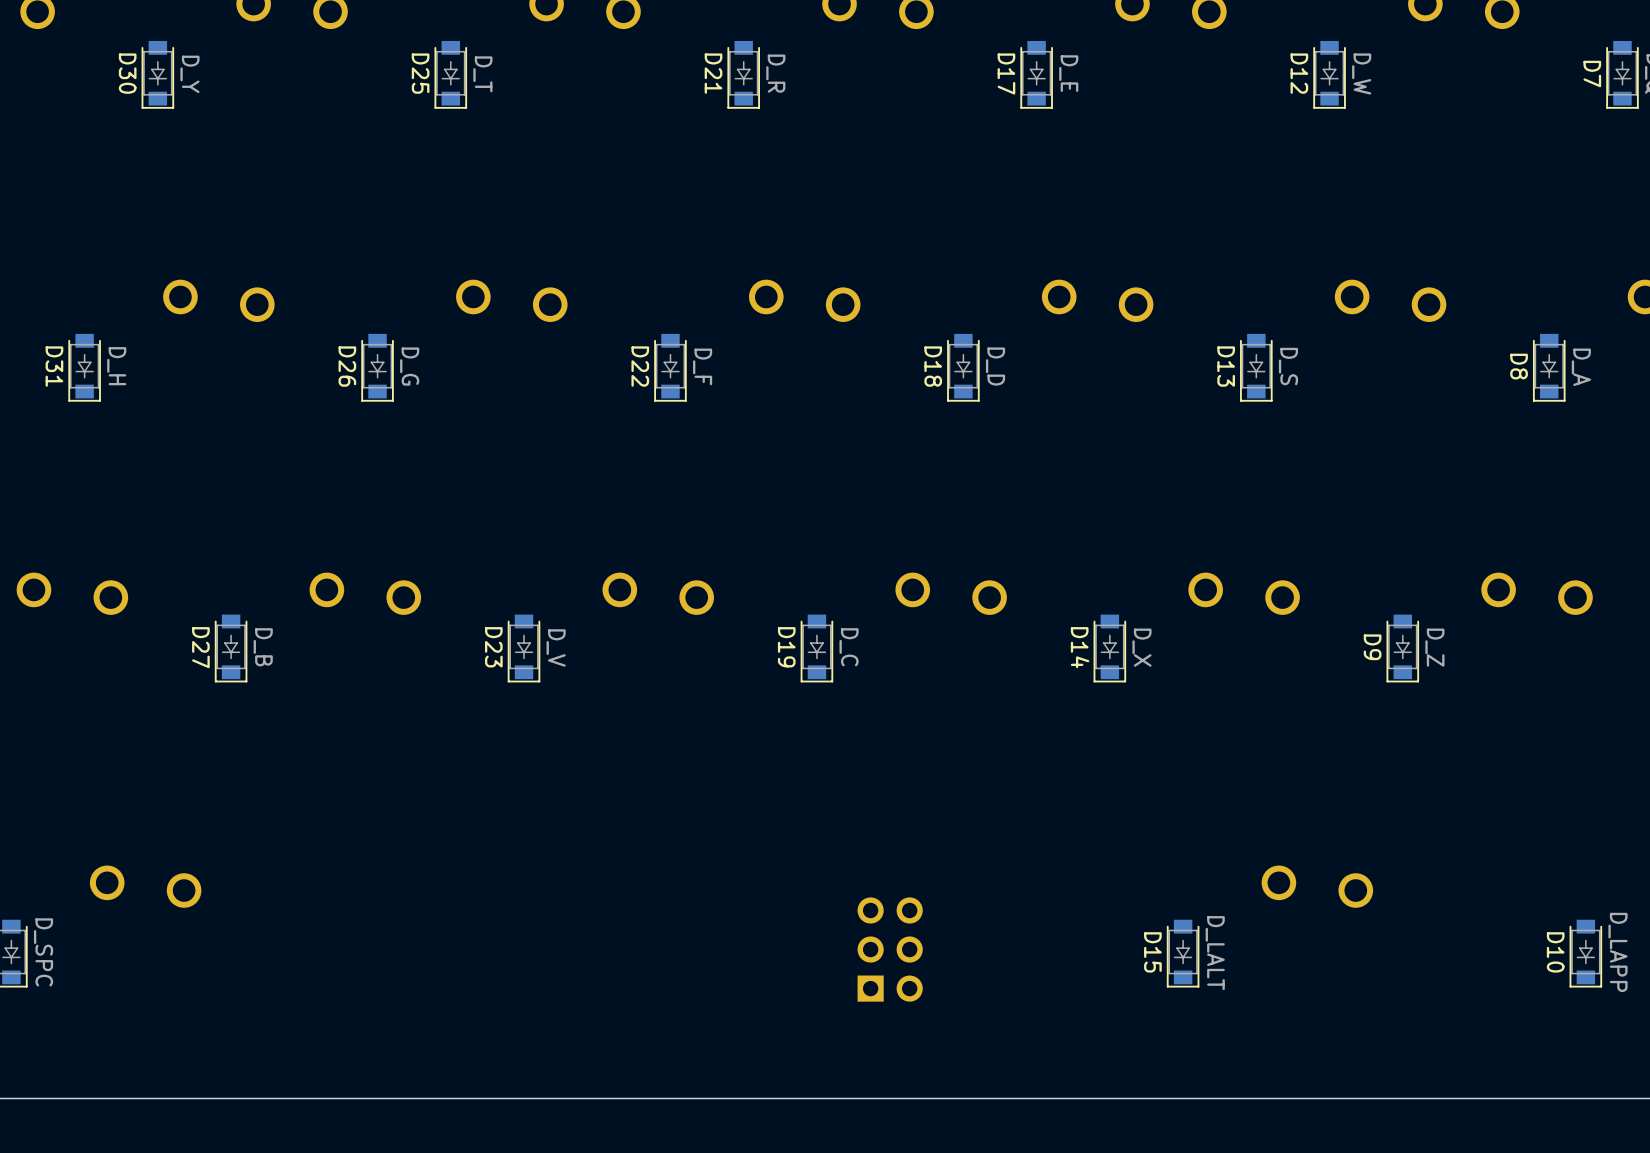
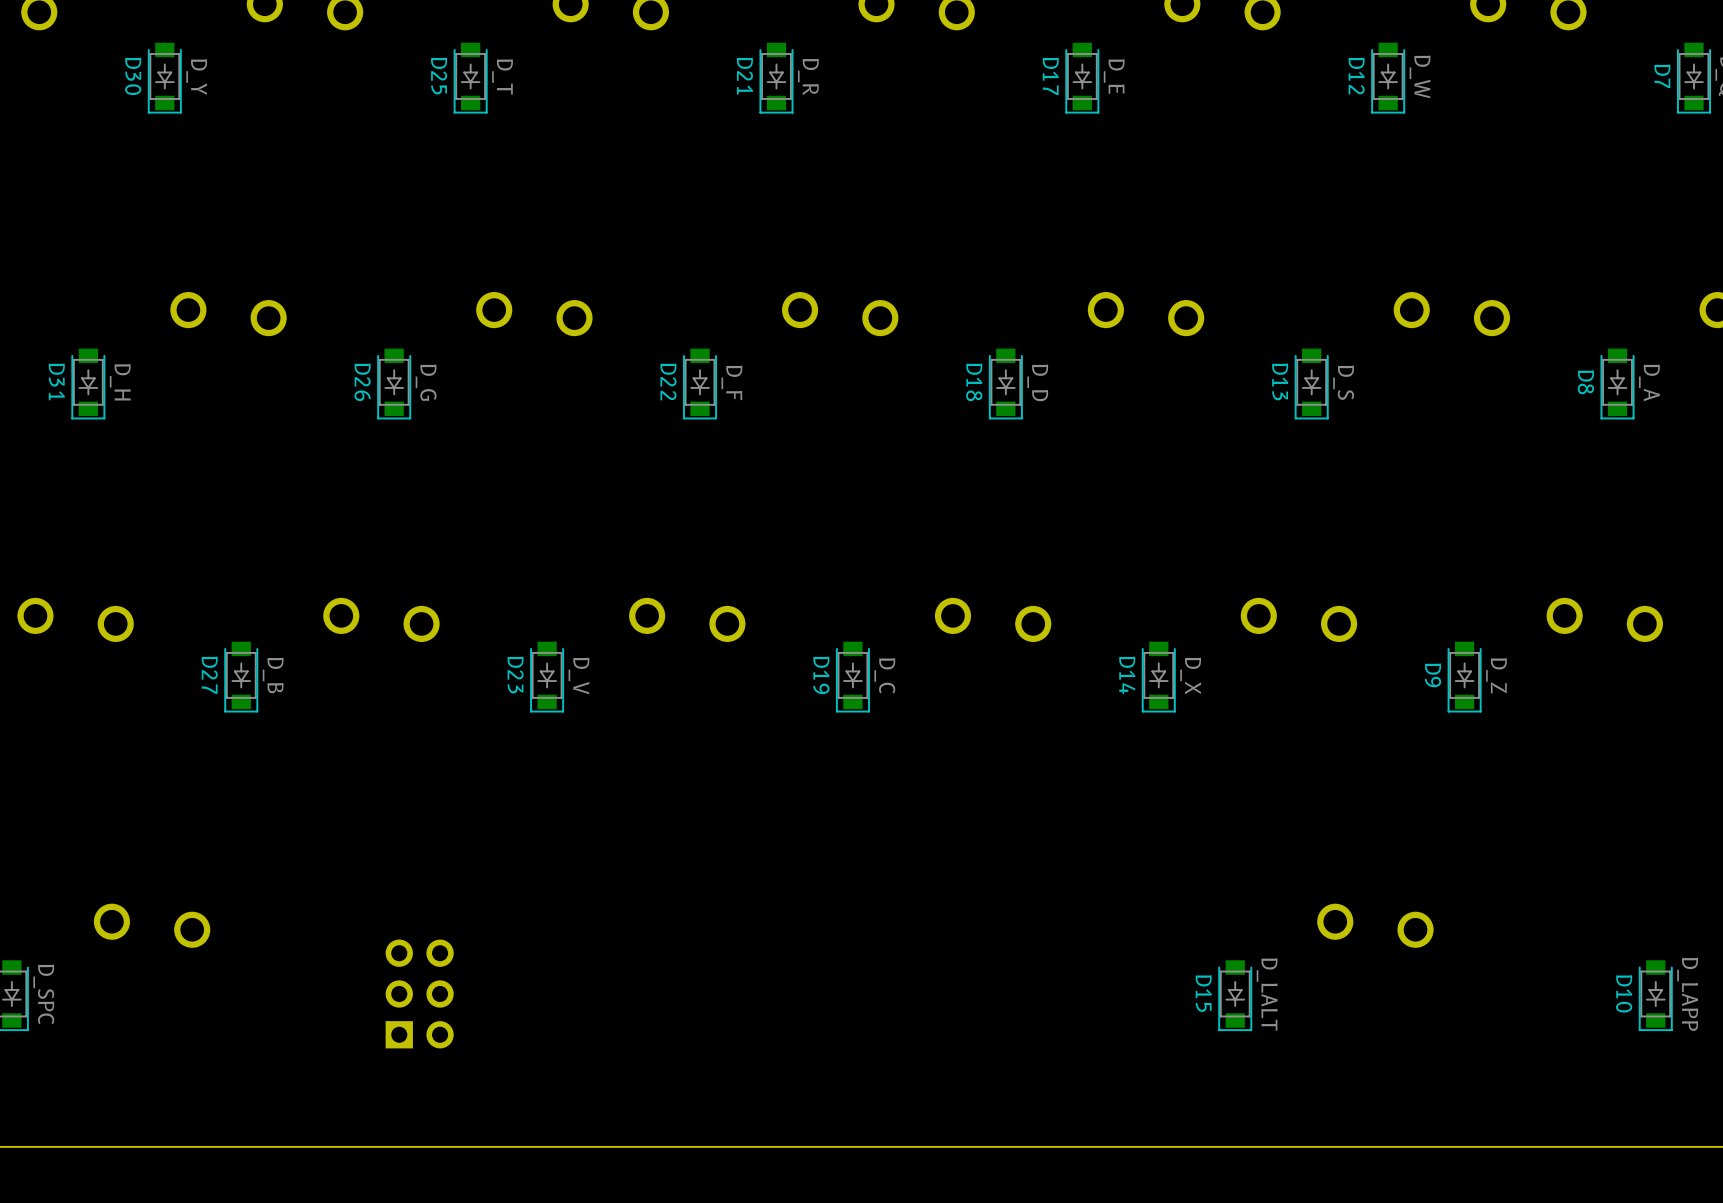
part: (890, 949) -> none
part: none -> (419, 993)

